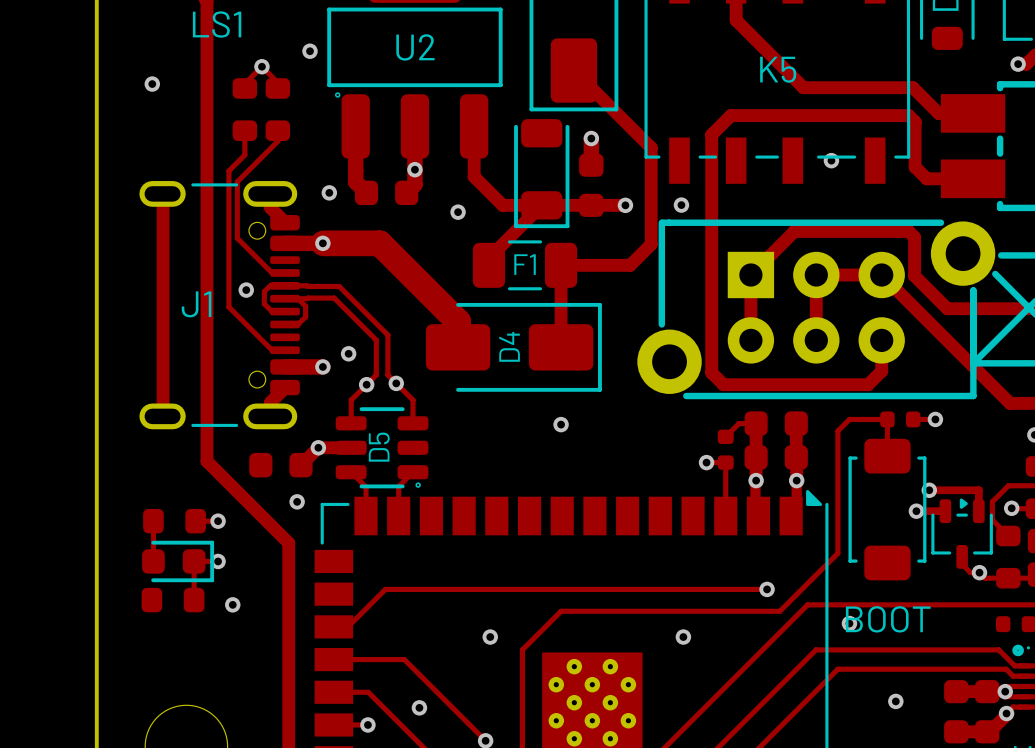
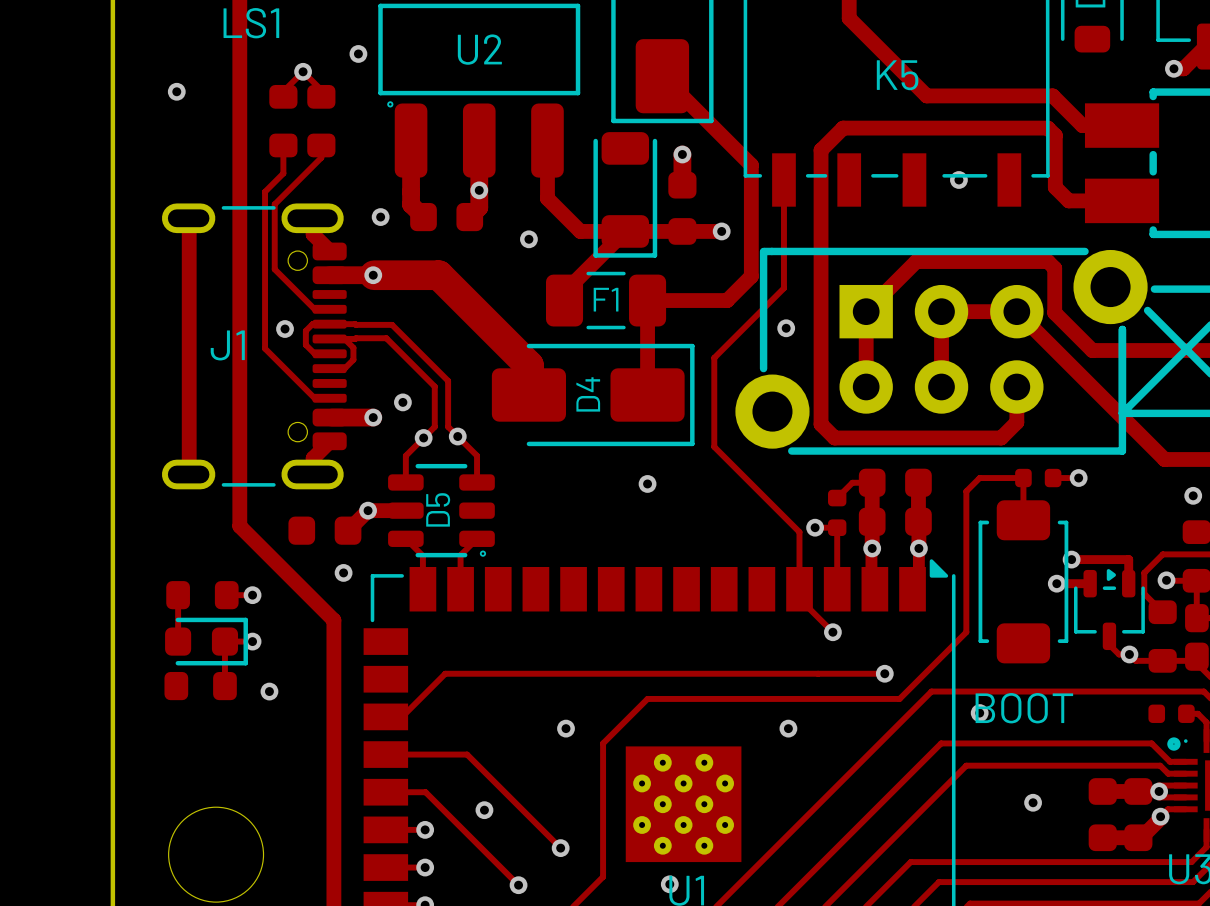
track: none -> (783, 179) (783, 288) (714, 357) (714, 446) (799, 532) (799, 598) (832, 632)
via position: (681, 205) -> (786, 328)
via: none -> (832, 632)

